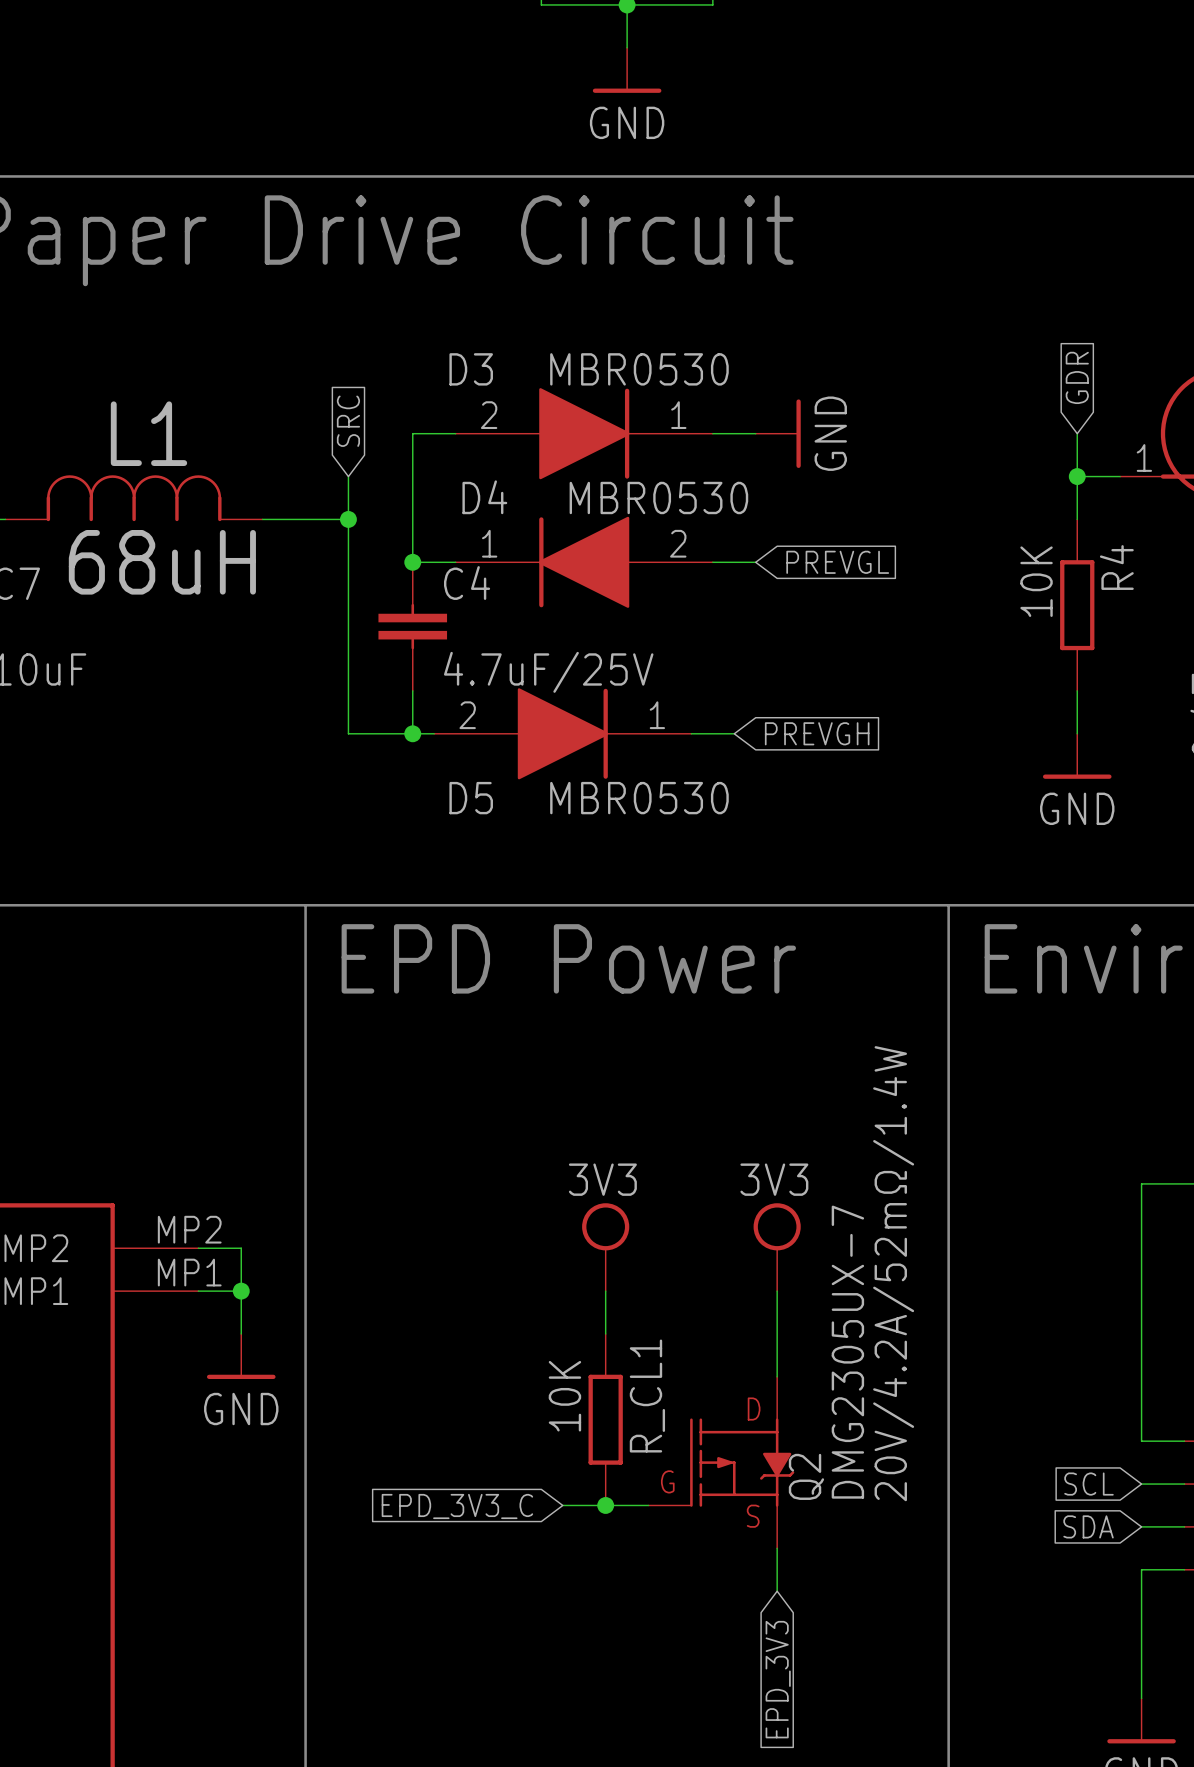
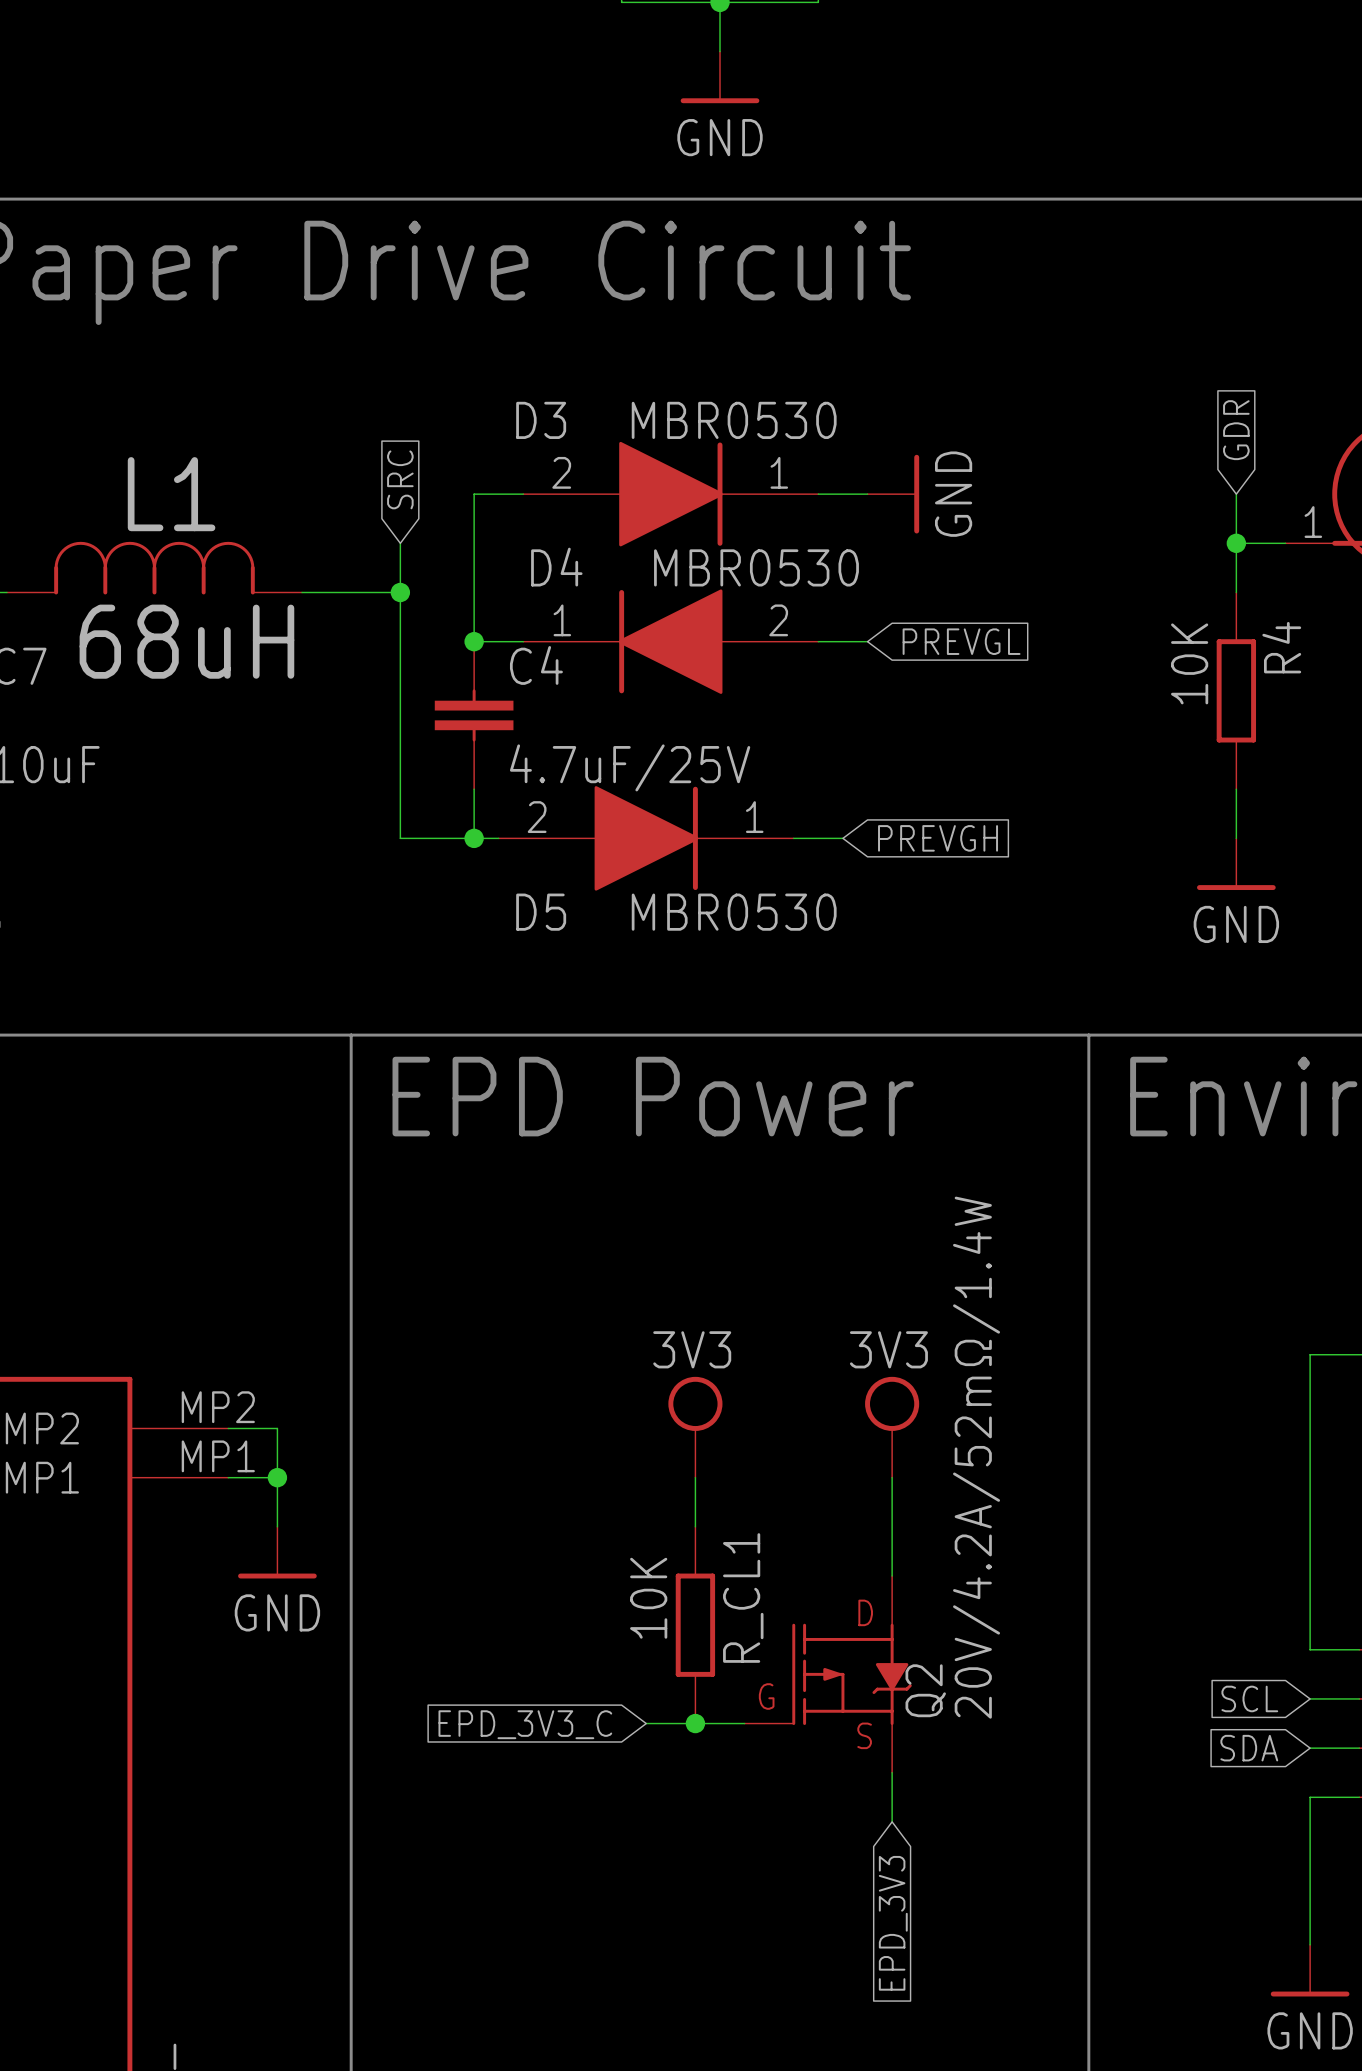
Q2 value position: 20V/4.2A/52mΩ/1.4W (893, 1273) -> 20V/4.2A/52mΩ/1.4W (976, 1457)
text: DMG2305UX-7 (847, 1352) -> none

